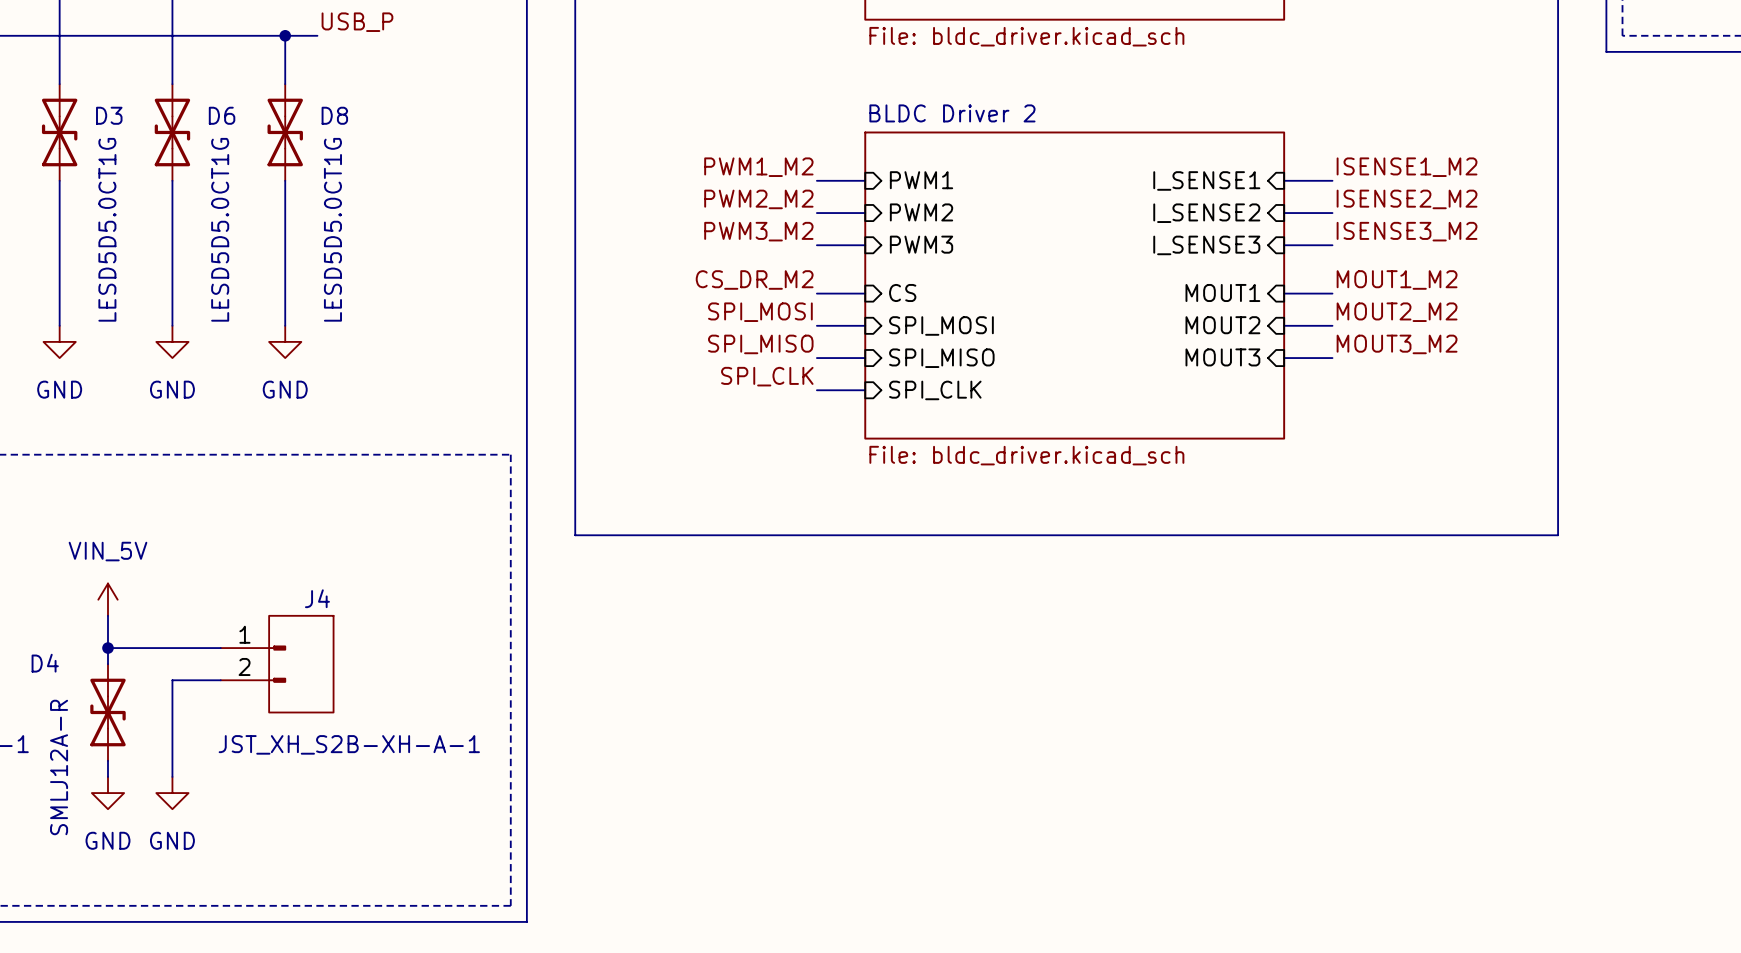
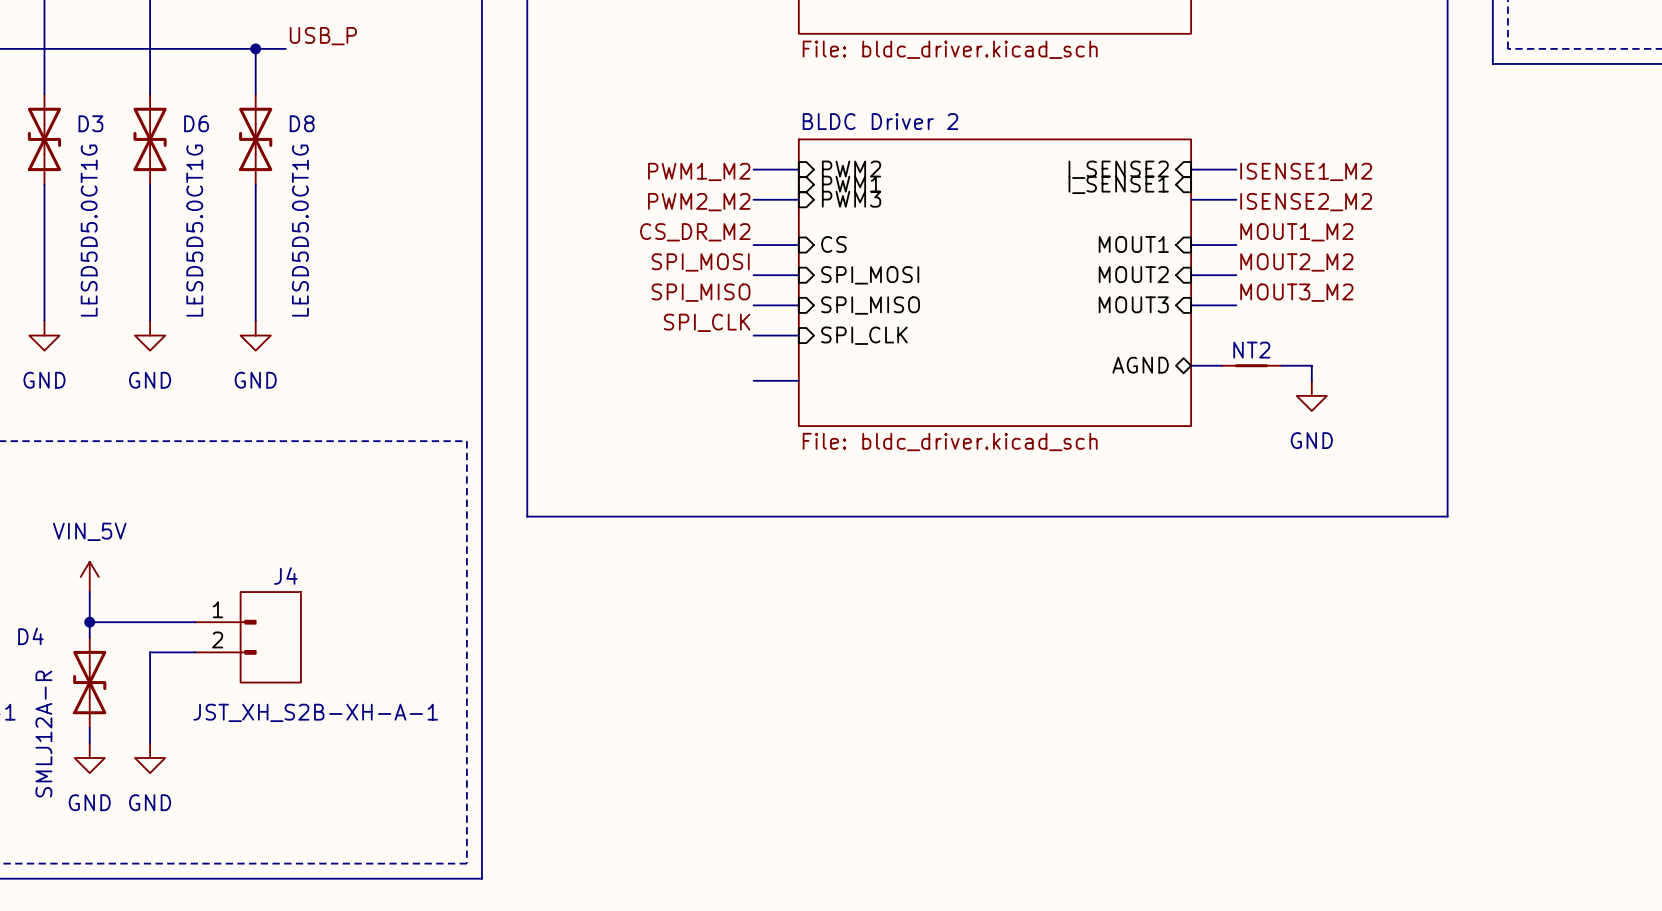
wire: (816, 180) (865, 180) -> (753, 169) (798, 169)
wire: (1284, 180) (1332, 180) -> (1191, 169) (1236, 169)
sheet pin: none -> PWM3 (851, 199)
sheet pin position: PWM2 (921, 212) -> PWM2 (851, 169)
wire: (816, 213) (865, 213) -> (753, 199) (798, 199)
sheet pin position: I_SENSE2 (1206, 213) -> I_SENSE2 (1118, 169)
wire: (1284, 213) (1332, 213) -> (1191, 199) (1236, 199)
label: PWM3_M2 (758, 231) -> CS_DR_M2 (695, 232)
label: ISENSE3_M2 (1407, 231) -> MOUT1_M2 (1296, 232)
sheet pin: PWM3 (921, 244) -> CS (833, 244)
sheet pin: I_SENSE3 (1206, 245) -> MOUT1 (1133, 244)
label: CS_DR_M2 (754, 279) -> none
label: MOUT1_M2 (1397, 279) -> none
sheet pin: CS (902, 292) -> none
sheet pin: MOUT1 (1222, 292) -> none
wire: (816, 293) (865, 293) -> (753, 275) (798, 275)
wire: (1284, 293) (1332, 293) -> (1191, 275) (1236, 275)
label position: SPI_MOSI (760, 312) -> SPI_MOSI (700, 262)
label position: MOUT2_M2 (1397, 312) -> MOUT2_M2 (1296, 262)
wire: (816, 325) (865, 325) -> (753, 305) (798, 305)
sheet pin position: SPI_MOSI (941, 325) -> SPI_MOSI (870, 275)
sheet pin position: MOUT2 (1222, 325) -> MOUT2 (1133, 274)
wire: (1284, 325) (1332, 325) -> (1191, 305) (1236, 305)
label position: SPI_MISO (760, 344) -> SPI_MISO (701, 292)
label position: MOUT3_M2 (1397, 344) -> MOUT3_M2 (1296, 292)
sheet pin position: MOUT3 (1222, 357) -> MOUT3 (1133, 304)
wire: (816, 358) (865, 358) -> (753, 335) (798, 335)
sheet pin position: SPI_MISO (941, 358) -> SPI_MISO (870, 305)
wire: (1284, 358) (1332, 358) -> none
sheet pin: none -> AGND (1140, 365)
wire: none -> (1191, 365) (1221, 365)
NT2: none -> (1251, 365)
wire: none -> (1281, 365) (1311, 365) (1311, 380)
label position: SPI_CLK (767, 376) -> SPI_CLK (707, 322)
sheet pin position: SPI_CLK (935, 390) -> SPI_CLK (864, 335)
power symbol: none -> GND (1311, 395)

